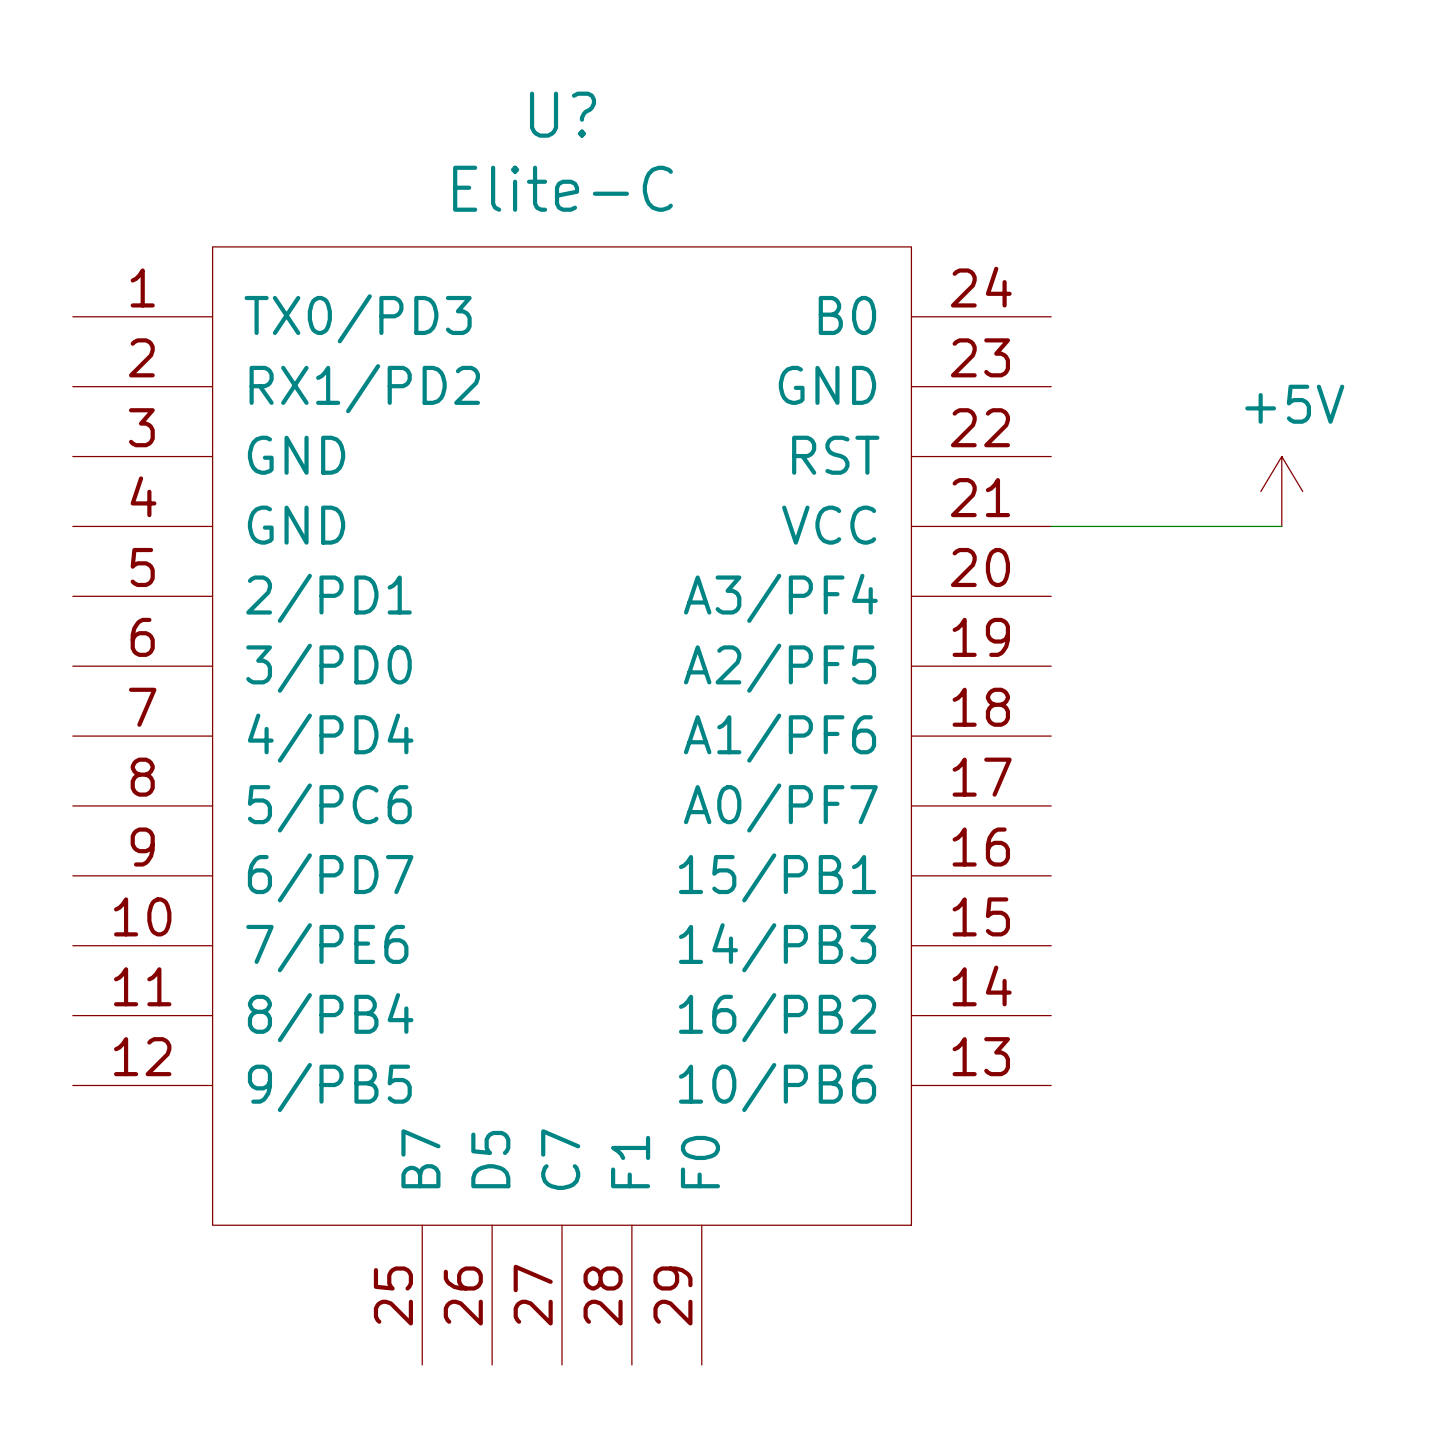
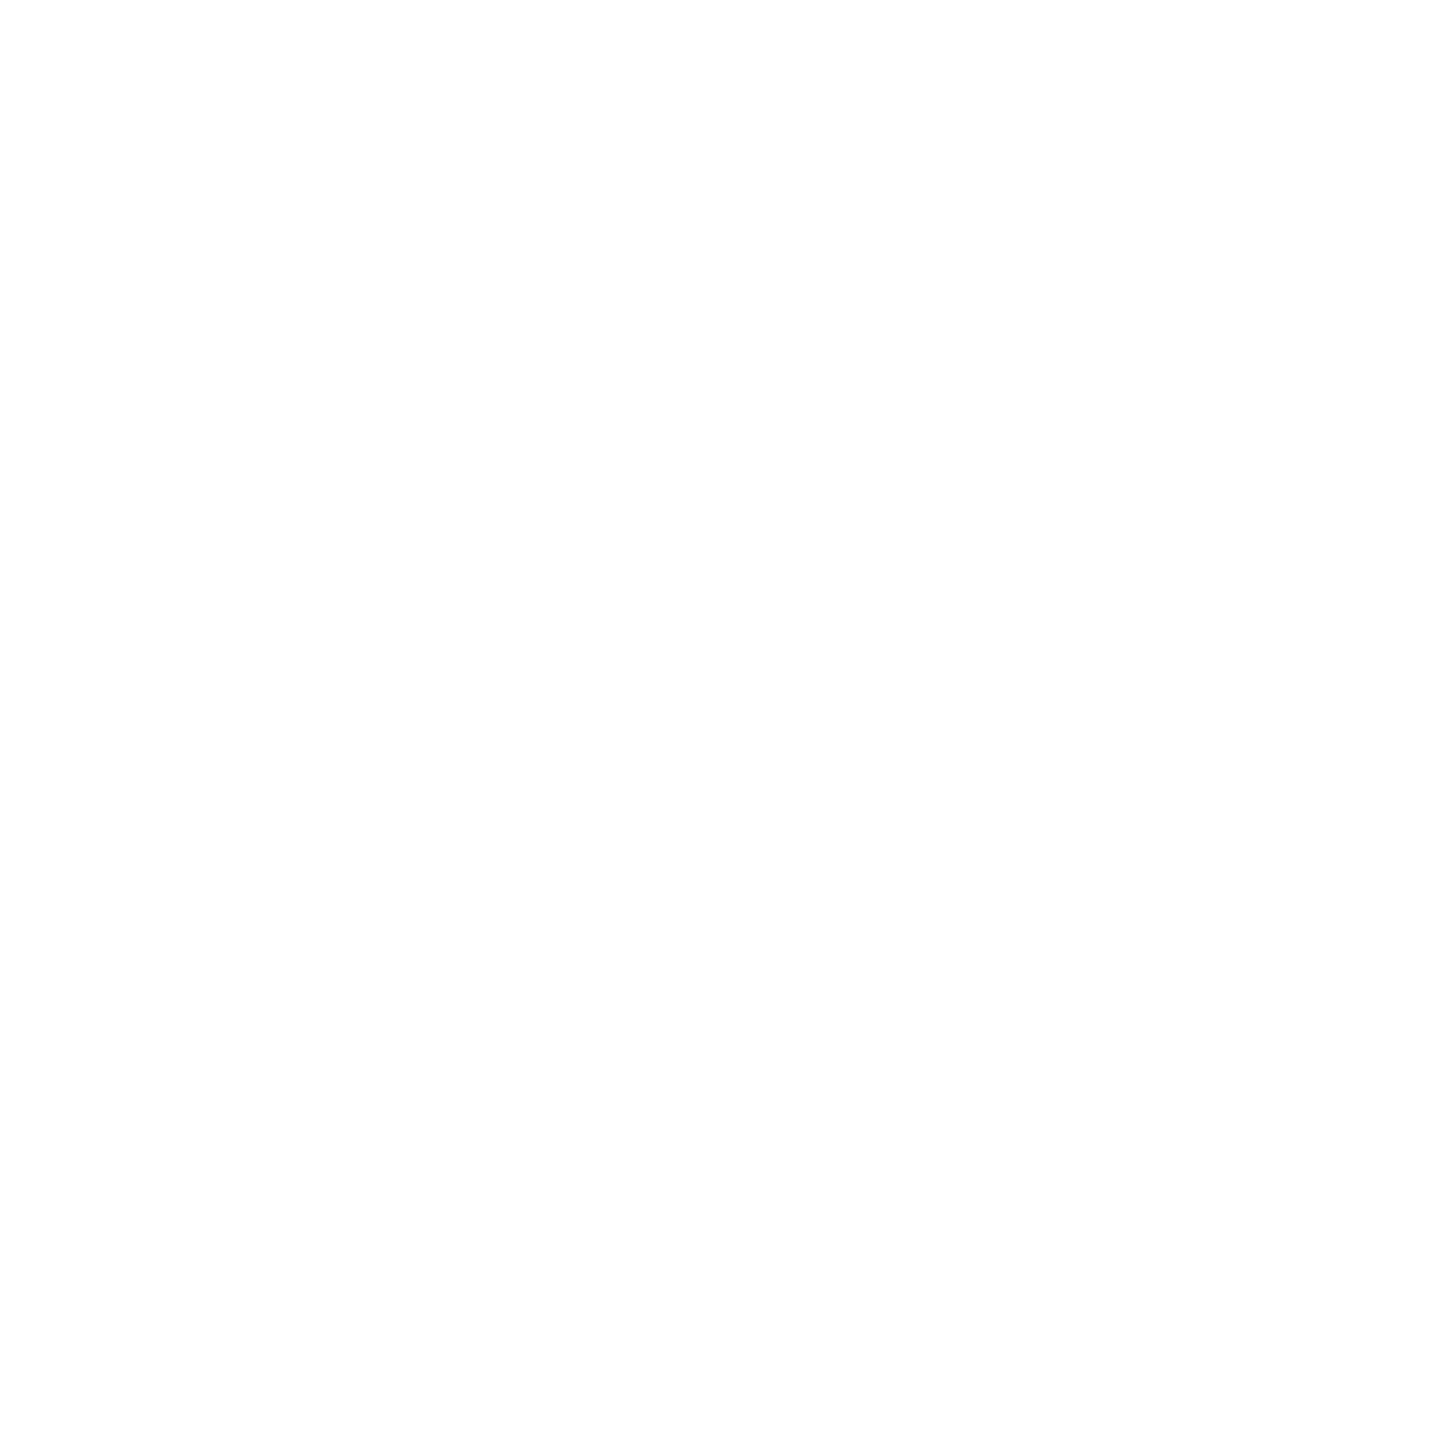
power symbol: +5V (1281, 491) -> none
wire: (1051, 526) (1281, 526) -> none
U?: Elite-C (562, 805) -> none

